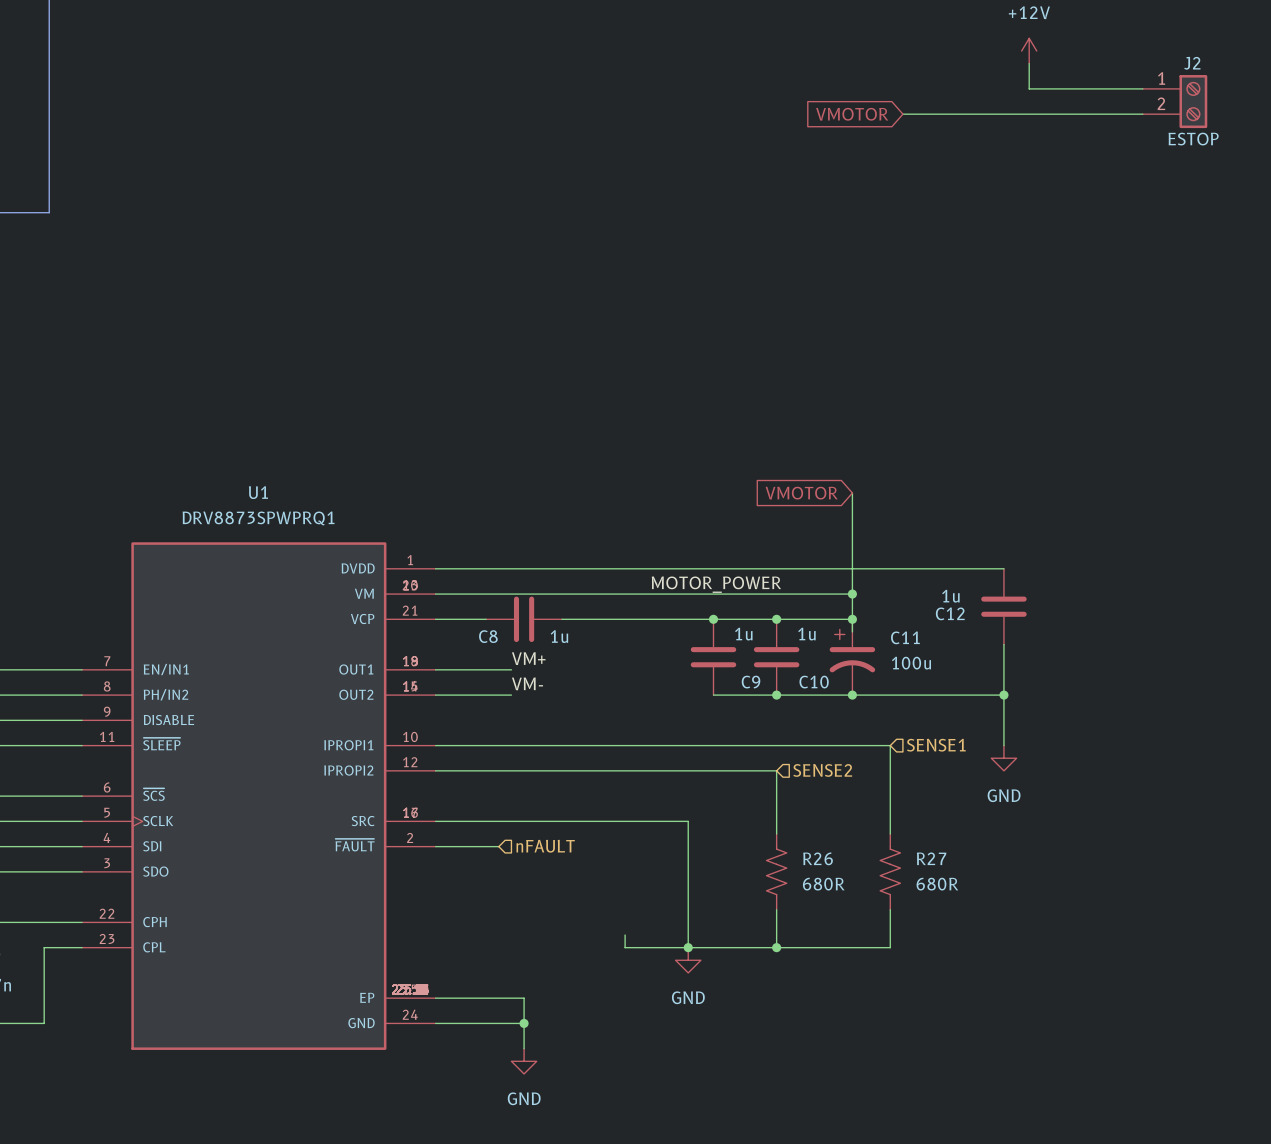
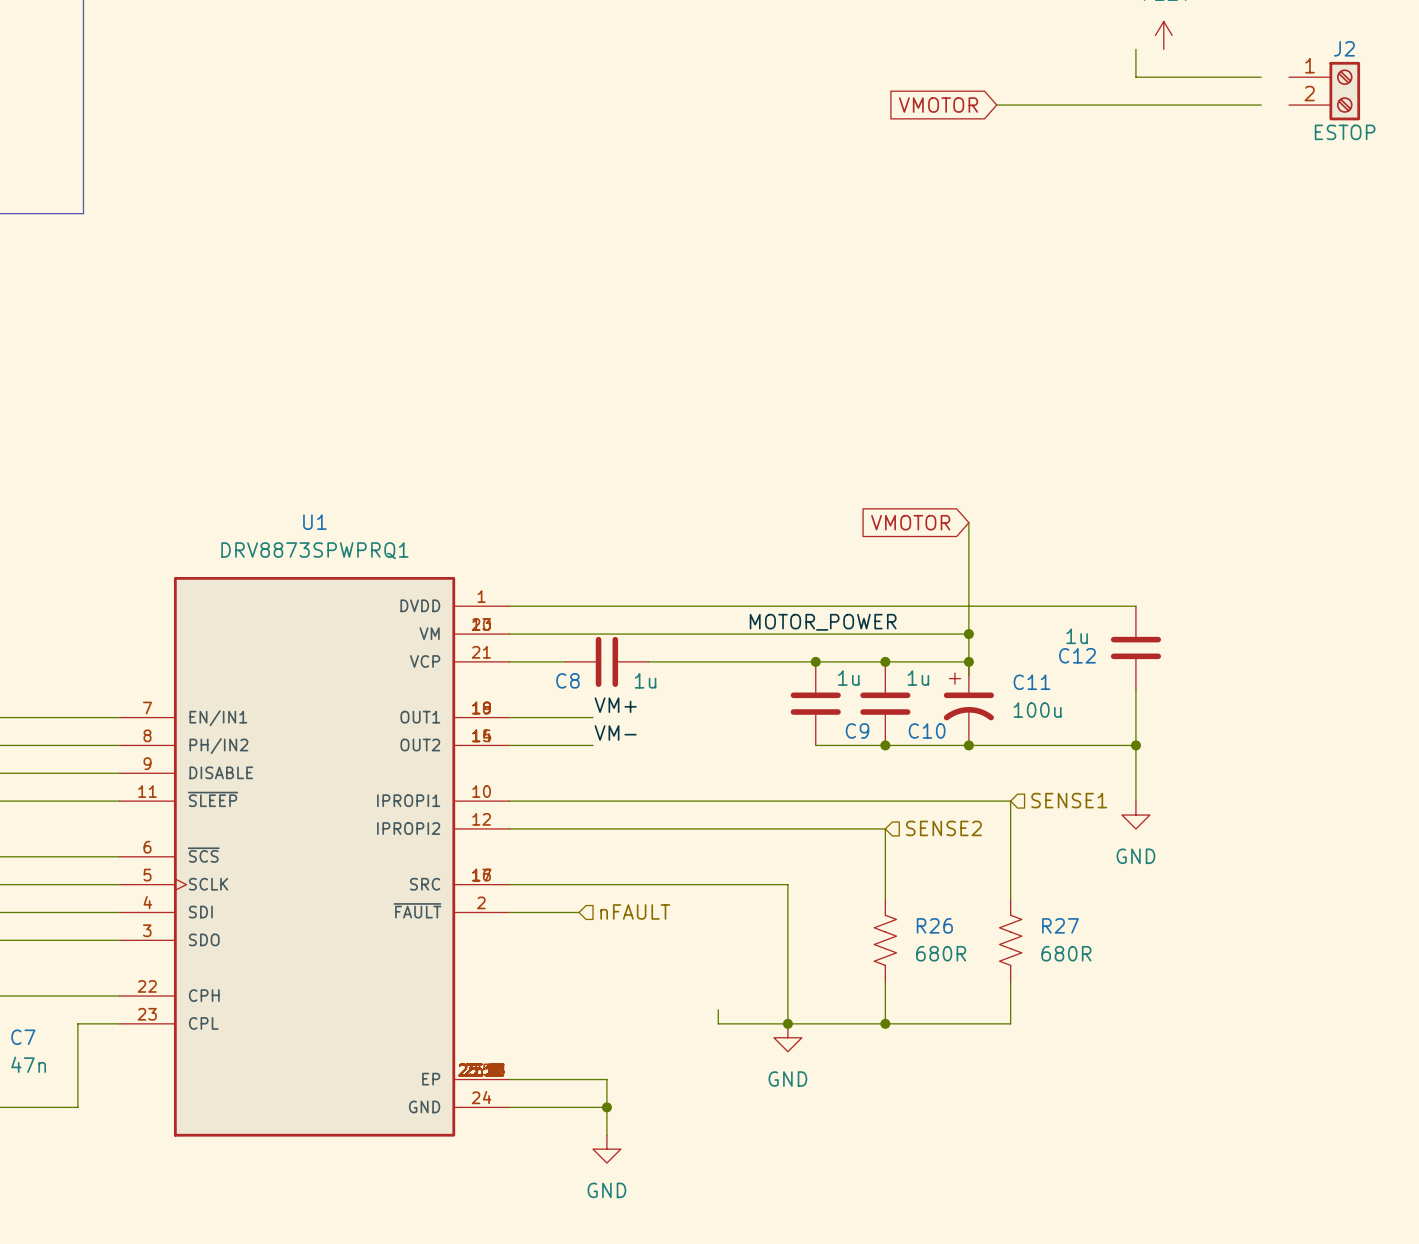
wire: (1029, 63) (1029, 88) -> (1135, 49) (1135, 77) (1163, 77)
wire: (1117, 88) (1142, 88) -> none
global label position: VMOTOR (852, 114) -> VMOTOR (938, 105)
wire: (1117, 114) (1142, 114) -> (996, 105) (1024, 105)

